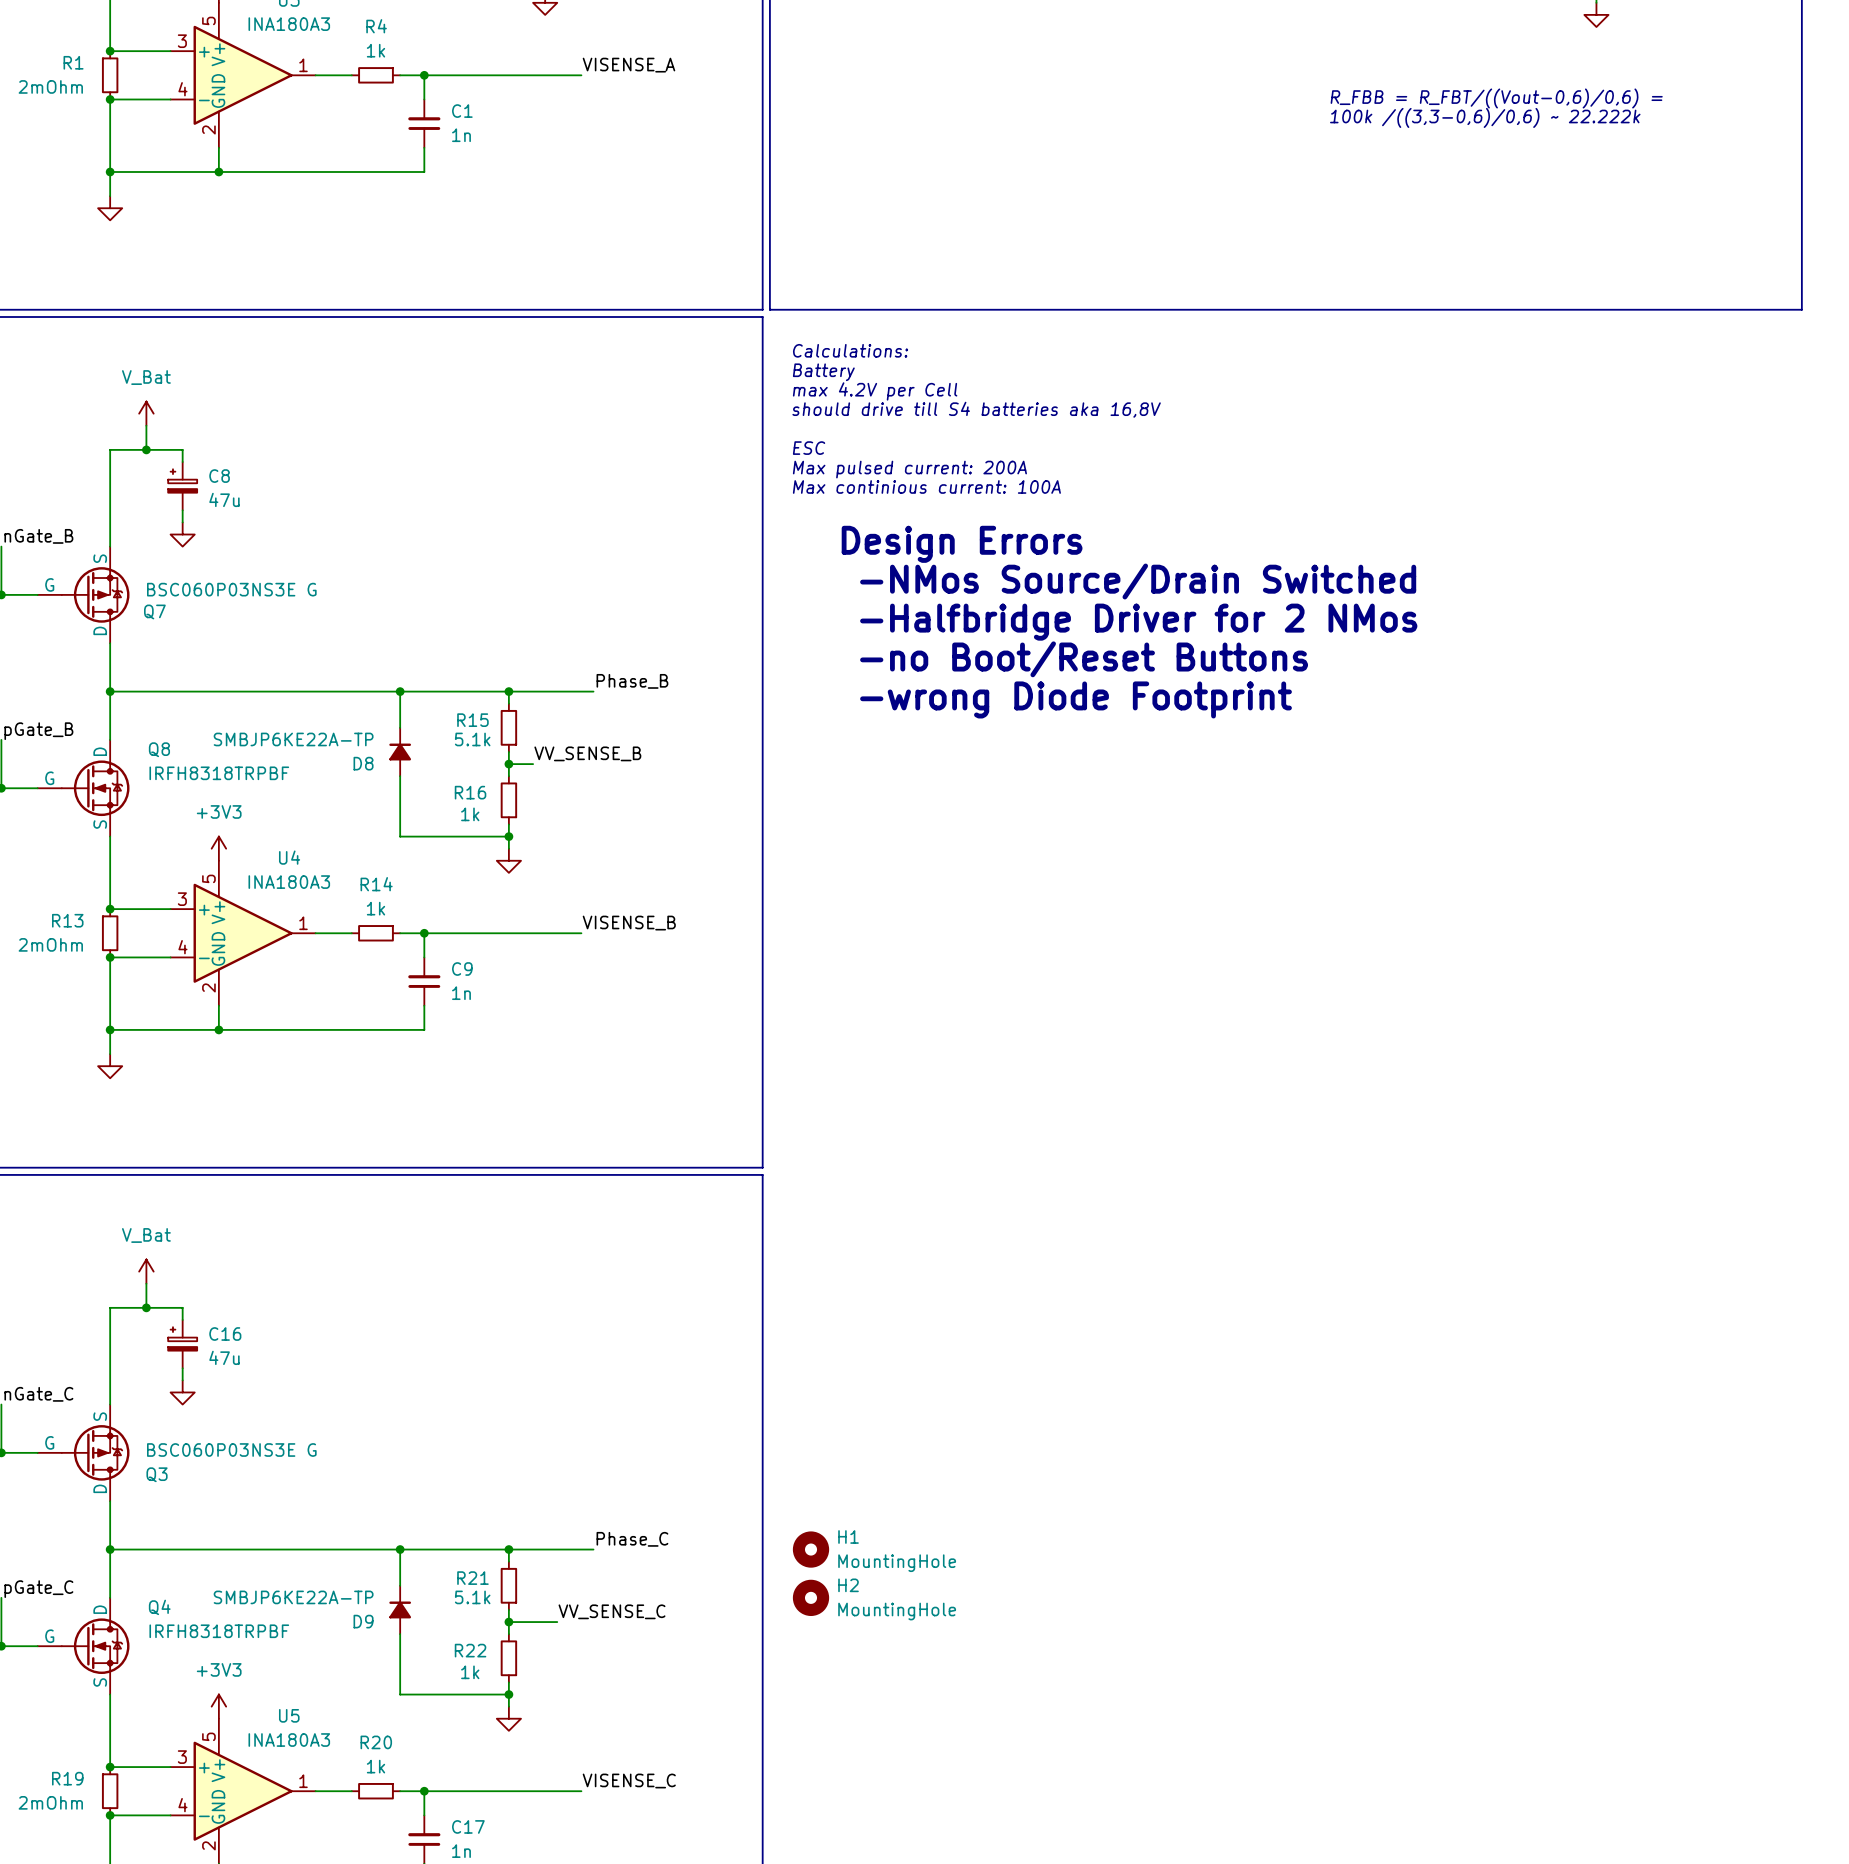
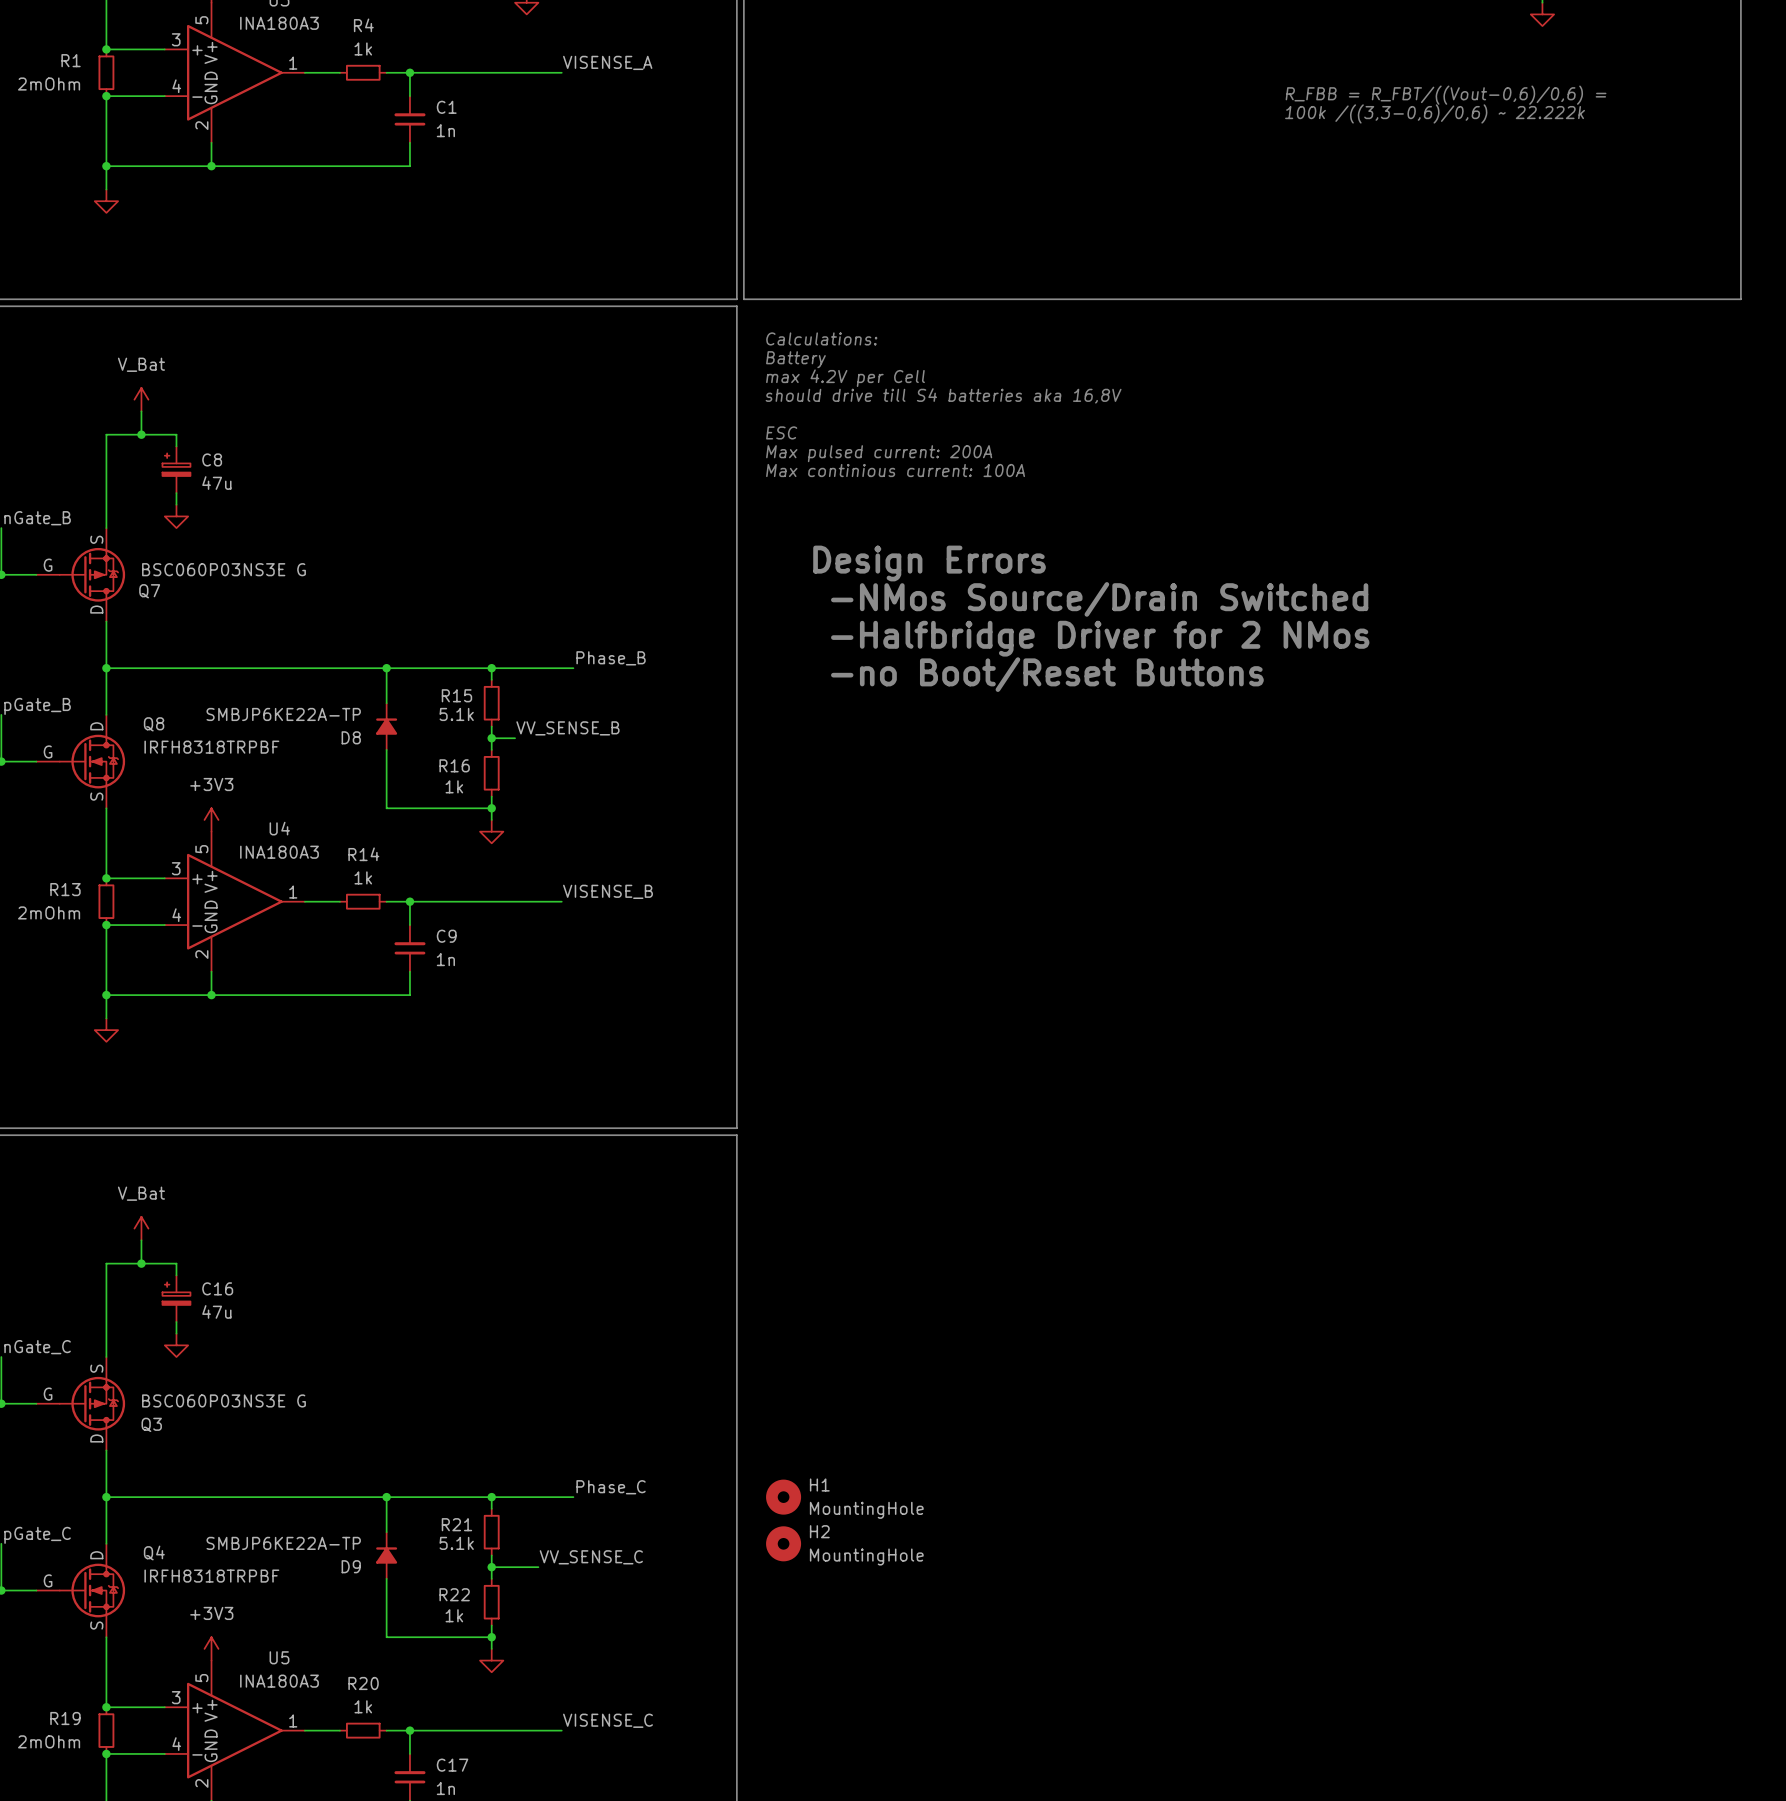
text: Design Errors (962, 544) -> none
text: -NMos Source/Drain Switched (1138, 581) -> Design Errors (929, 563)
text: -Halfbridge Driver for 2 NMos (1138, 622) -> -NMos Source/Drain Switched (1099, 599)
text: -no Boot/Reset Buttons (1084, 659) -> -Halfbridge Driver for 2 NMos (1100, 638)
text: -wrong Diode Footprint (1076, 699) -> -no Boot/Reset Buttons (1047, 674)

